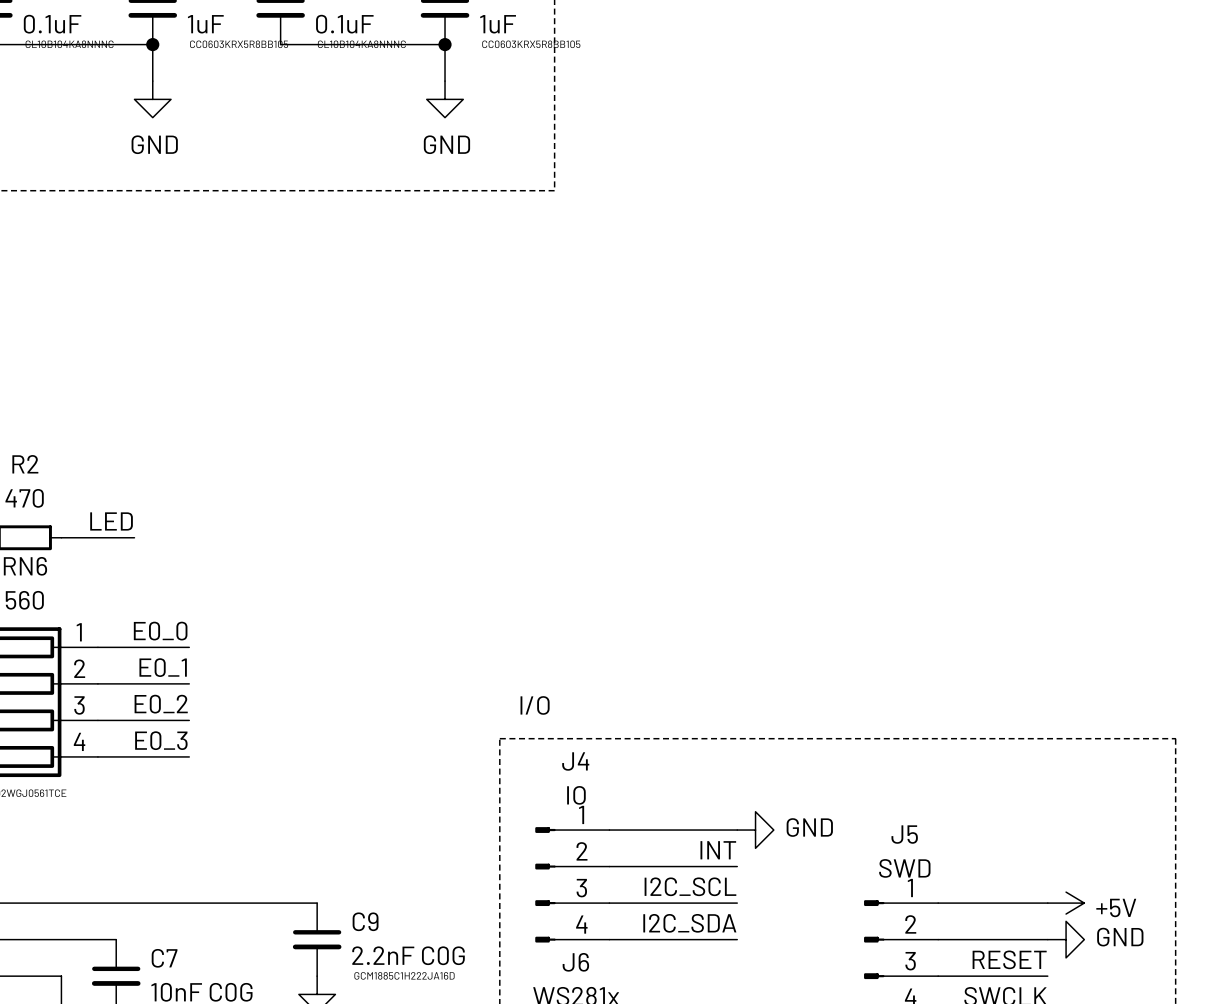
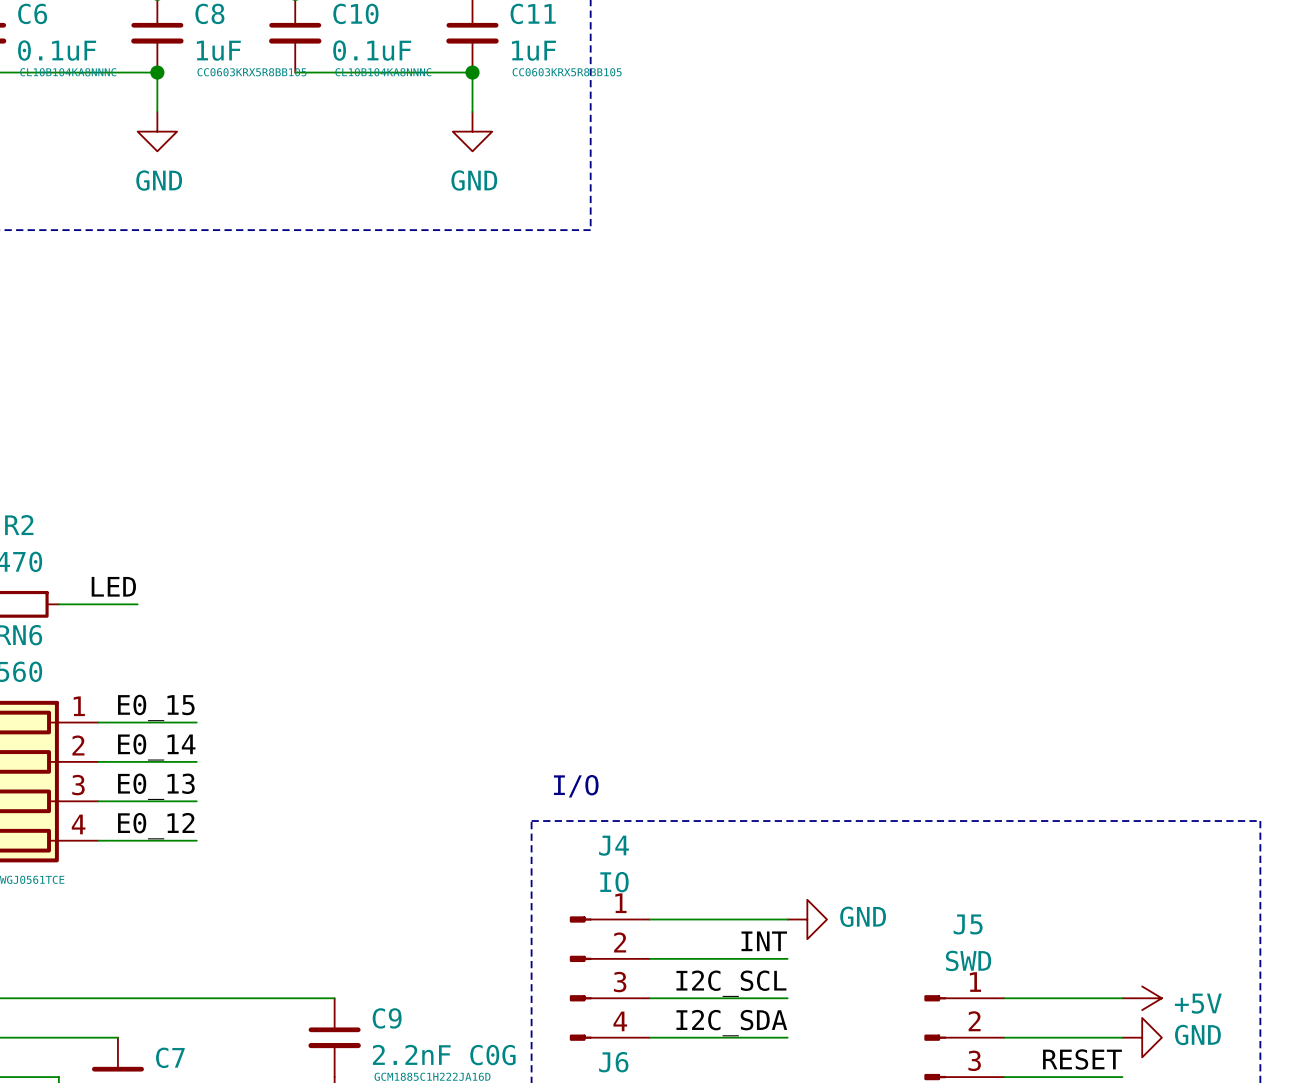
label: E0_0 (160, 631) -> E0_15 (156, 707)
label: E0_1 (163, 667) -> E0_14 (156, 747)
label: E0_2 (161, 704) -> E0_13 (156, 786)
label: E0_3 (161, 740) -> E0_12 (156, 826)

